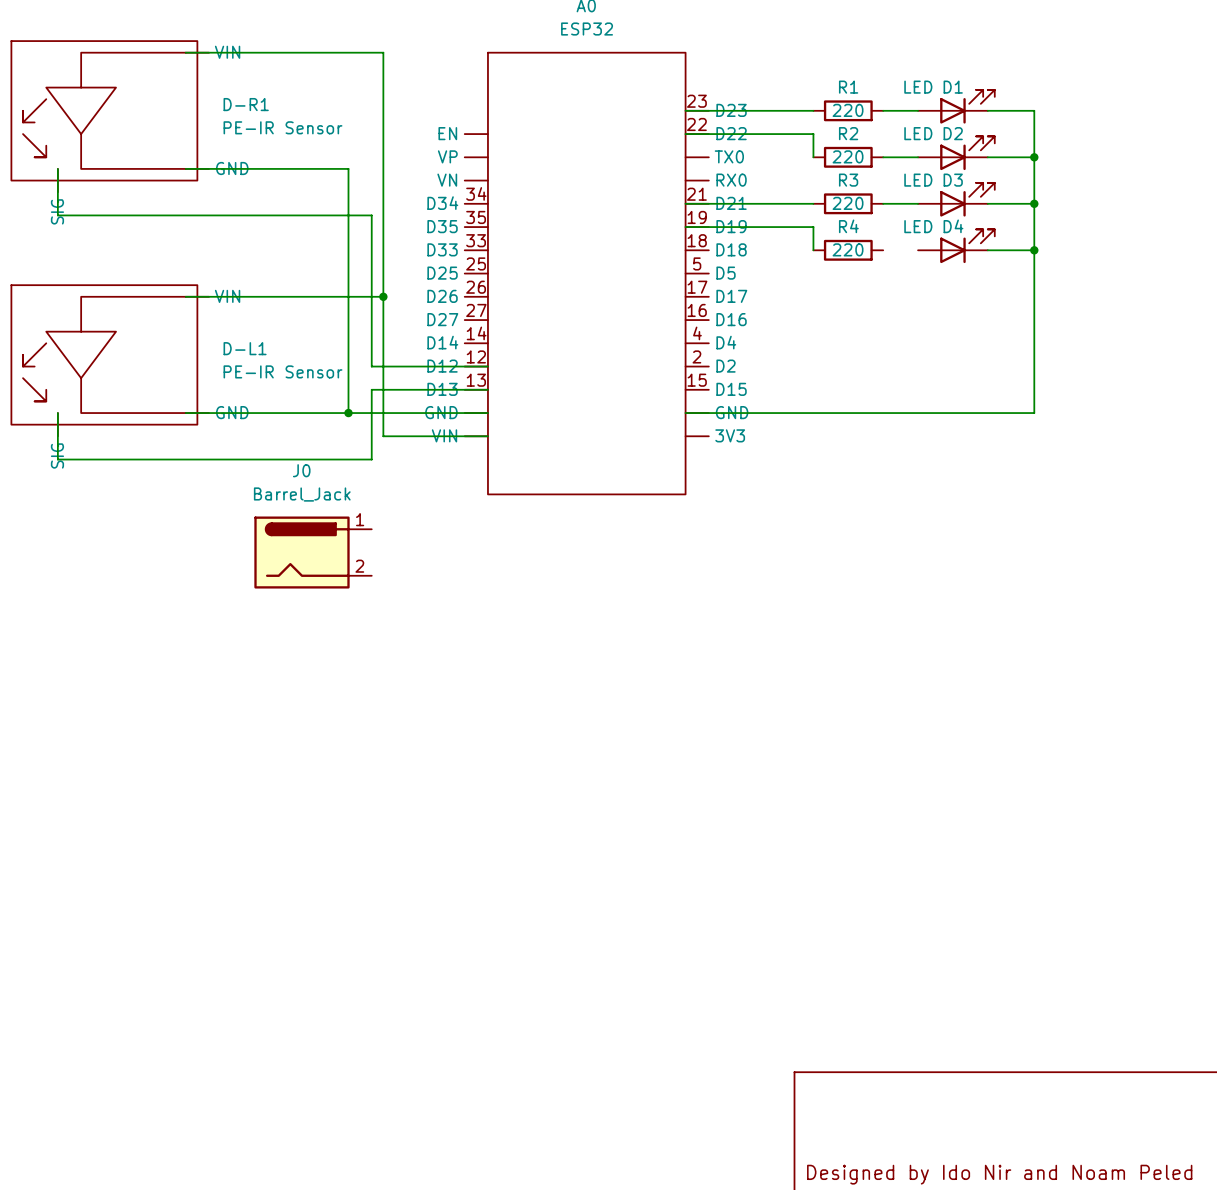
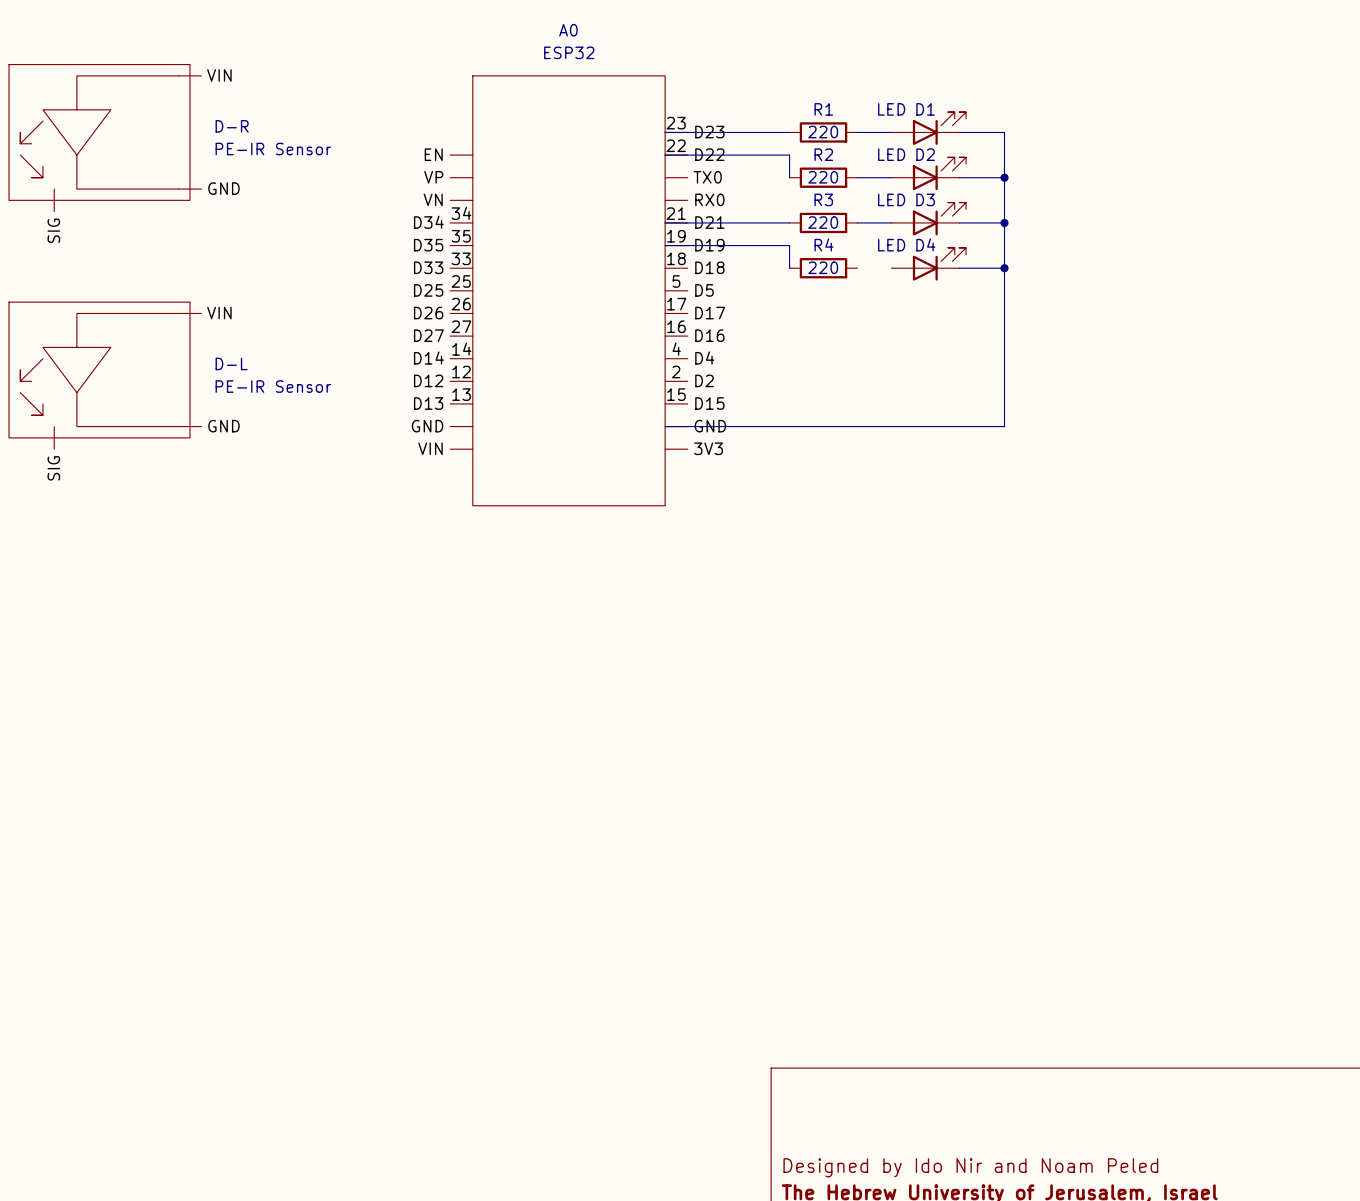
wire: (185, 52) (383, 52) (383, 436) (487, 436) -> none
D-R1 name: D-R1 (246, 104) -> D-R (232, 126)
wire: (57, 168) (57, 215) (371, 215) (371, 366) (487, 366) -> none
wire: (185, 168) (348, 168) (348, 413) -> none
wire: (185, 296) (383, 296) -> none
junction: (383, 296) -> none
D-L1 name: D-L1 (245, 348) -> D-L (231, 363)
wire: (487, 389) (371, 389) (371, 459) (57, 459) (57, 413) -> none
wire: (185, 413) (487, 413) -> none
junction: (348, 413) -> none
J0: Barrel_Jack (313, 552) -> none

